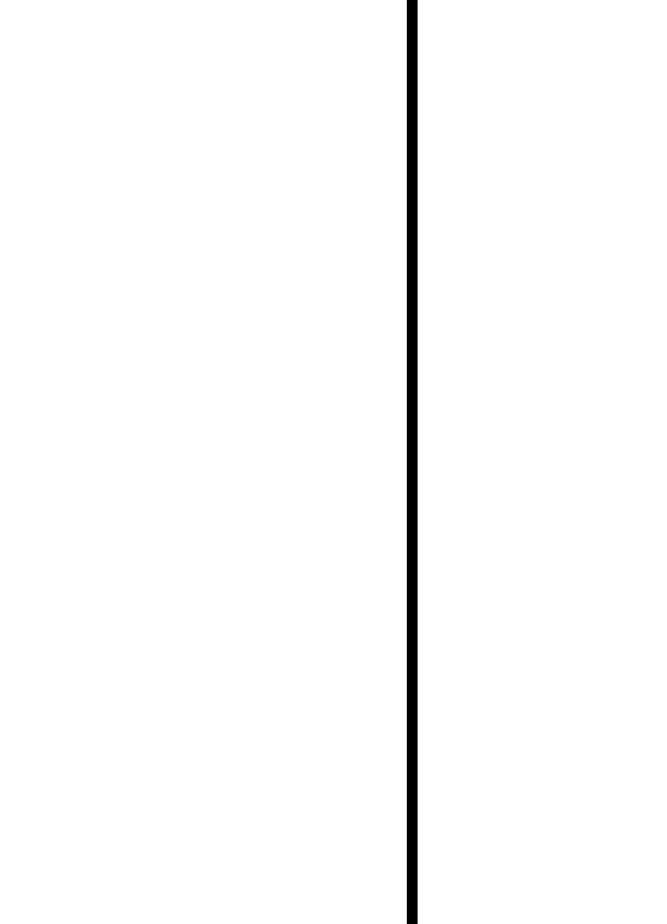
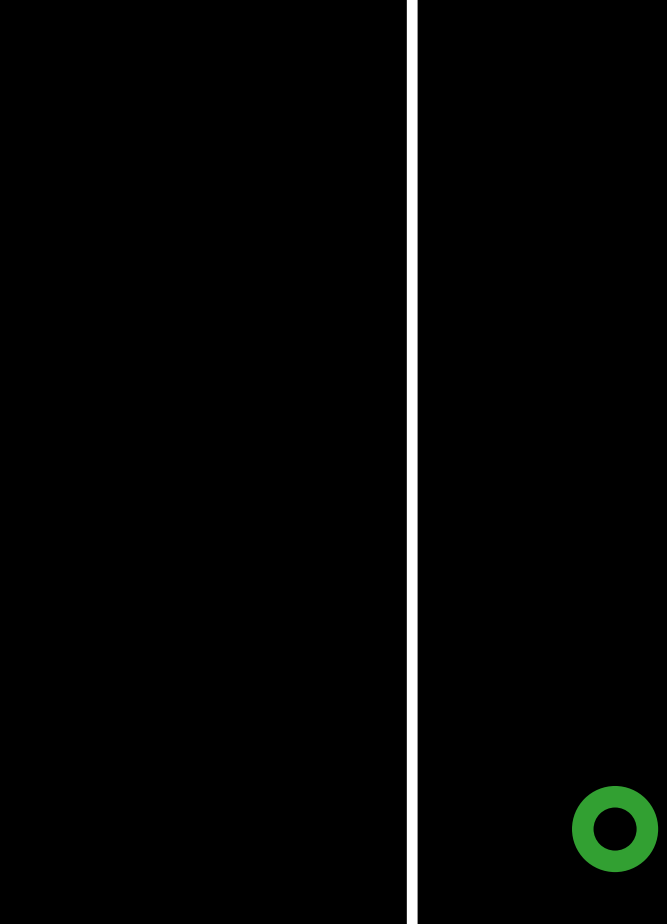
via: none -> (615, 829)

